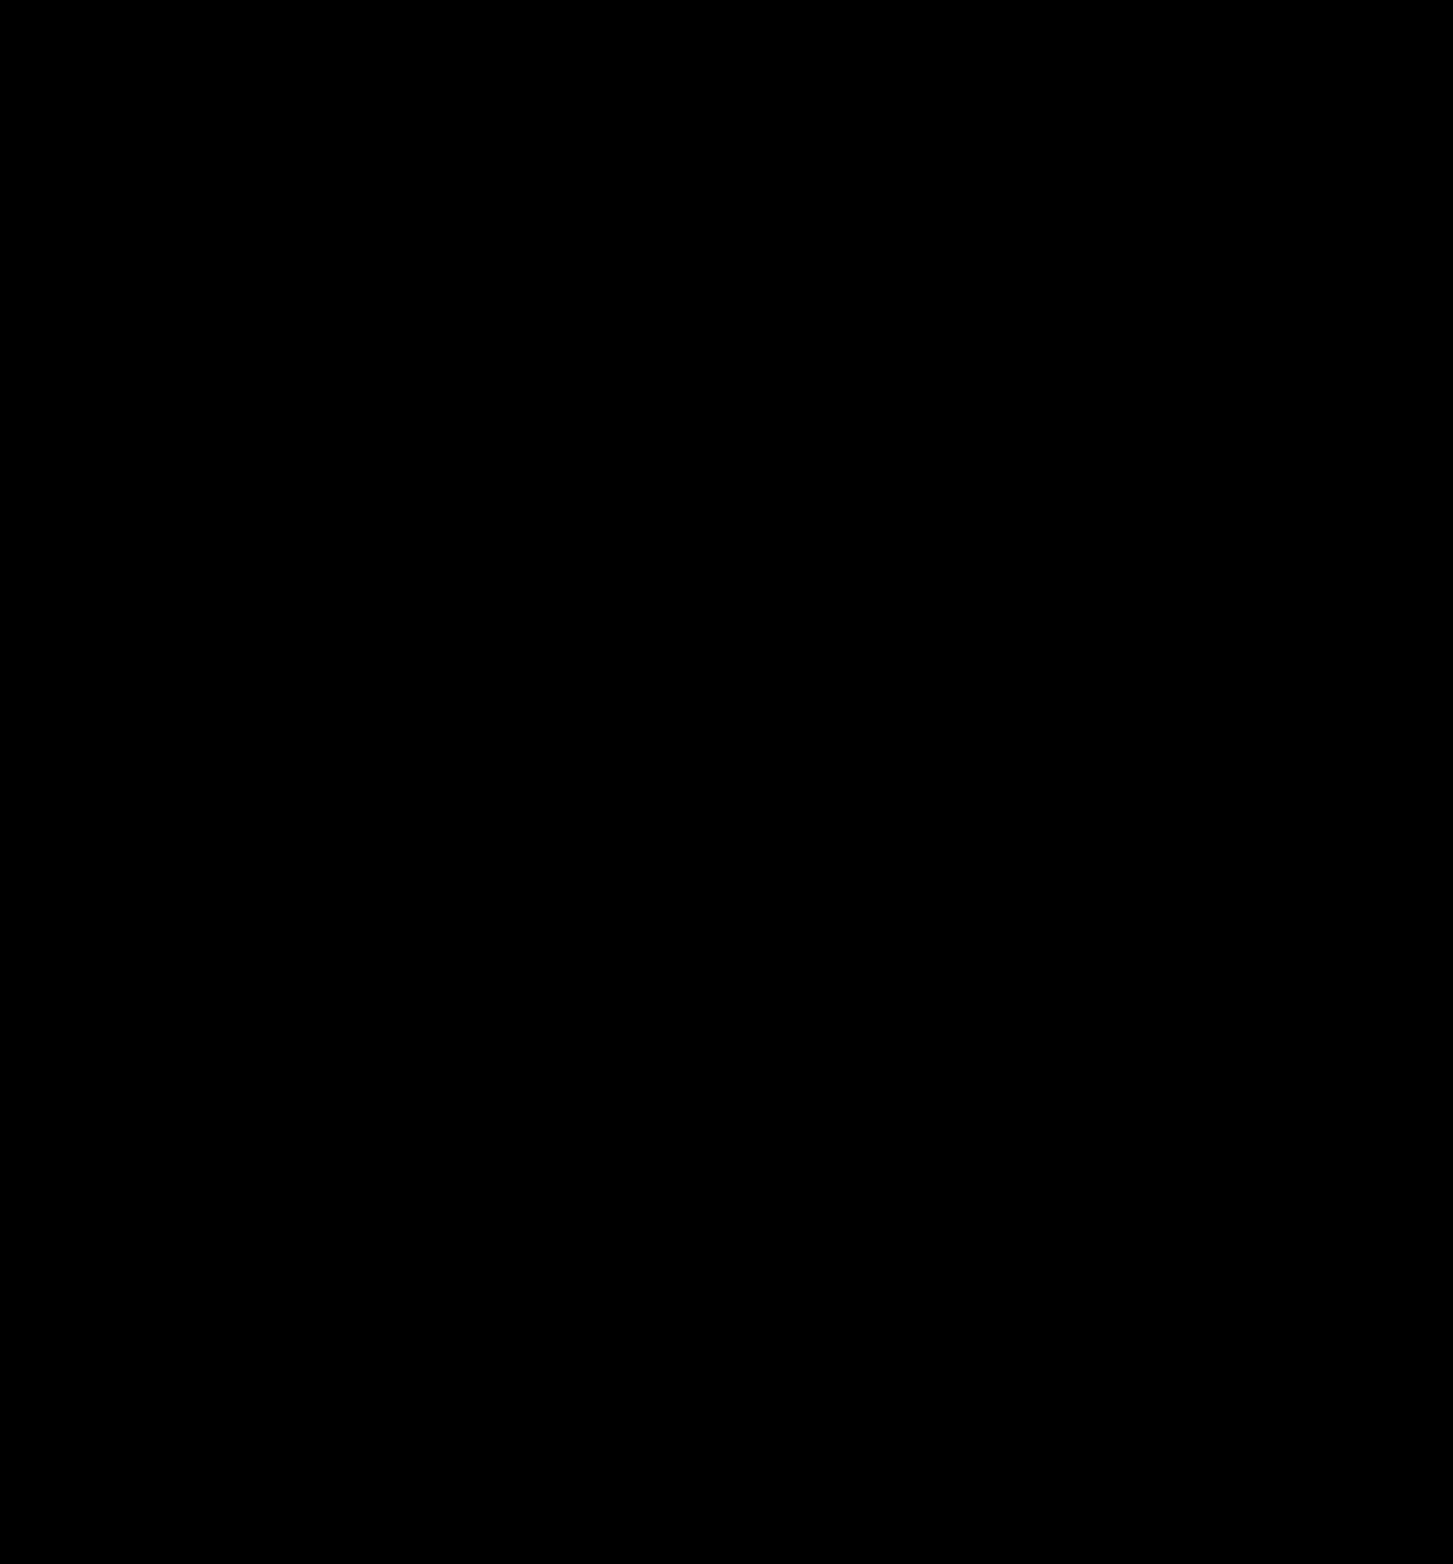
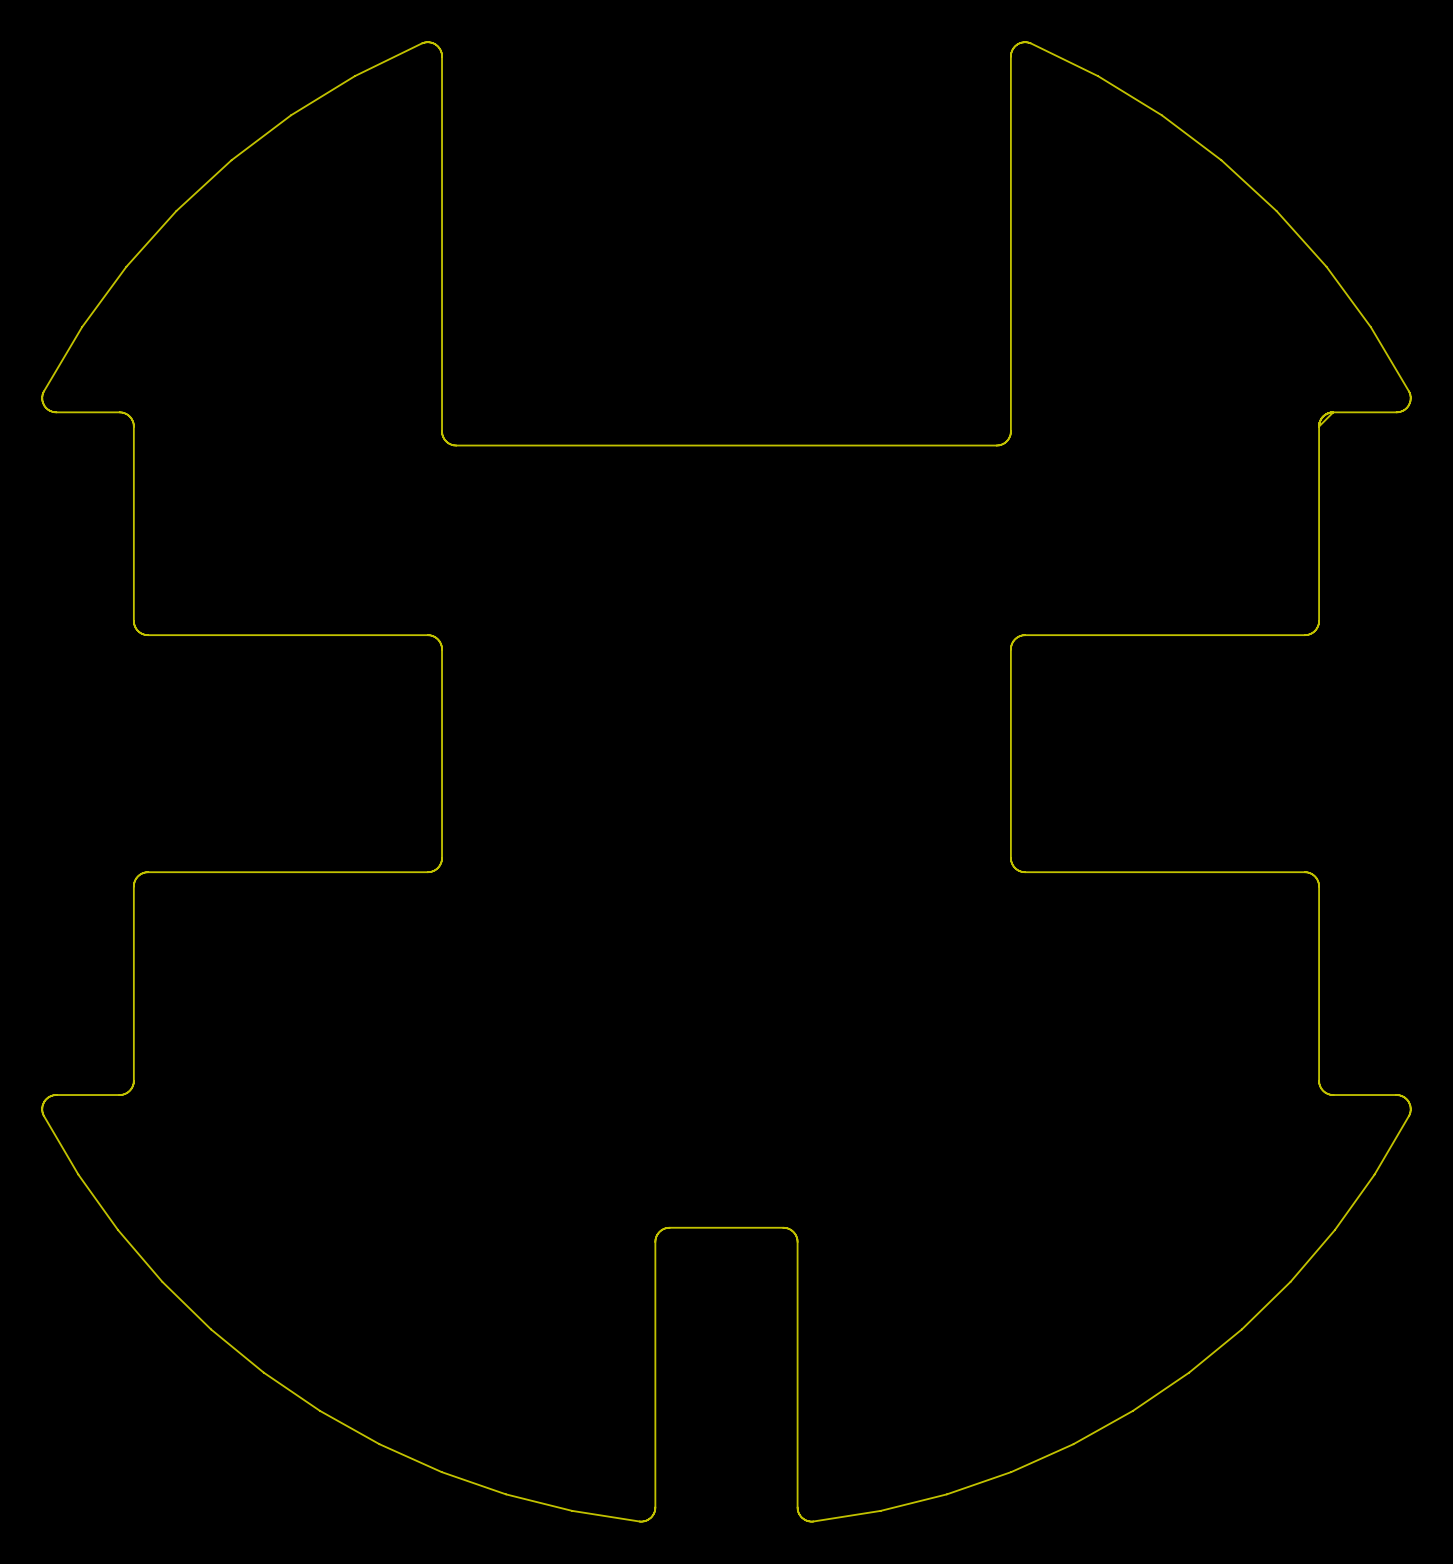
board edge: none -> (1333, 412) (1323, 416) (1319, 426)
board edge: none -> (1333, 412) (1399, 412) (1407, 407) (1410, 397) (1409, 391) (1370, 327) (1326, 266) (1276, 211) (1221, 160) (1161, 115) (1098, 76) (1030, 43) (1024, 42) (1015, 46) (1010, 56) (1010, 431) (1009, 438) (1004, 442) (996, 445) (451, 444) (444, 439) (442, 431) (441, 52) (435, 44) (424, 42) (354, 76) (291, 115) (231, 160) (176, 211) (126, 266) (82, 327) (43, 391) (42, 400) (46, 407) (53, 412) (122, 412) (127, 414) (132, 420) (133, 620) (135, 628) (140, 633) (148, 635) (427, 635) (438, 640) (442, 649) (441, 861) (435, 869) (427, 872) (148, 872) (139, 874) (135, 879) (133, 886) (133, 1085) (128, 1091) (122, 1094) (52, 1095) (43, 1102) (42, 1109) (43, 1115) (78, 1174) (118, 1230) (162, 1281) (211, 1329) (263, 1372) (320, 1410) (379, 1444) (441, 1472) (506, 1494) (572, 1510) (639, 1521) (648, 1519) (654, 1513) (655, 1241) (658, 1232) (667, 1227) (783, 1227) (791, 1230) (796, 1236) (797, 1507) (798, 1513) (804, 1519) (813, 1521) (880, 1510) (946, 1494) (1011, 1472) (1073, 1444) (1132, 1410) (1189, 1372) (1241, 1329) (1290, 1281) (1334, 1230) (1374, 1174) (1410, 1113) (1409, 1102) (1400, 1095) (1330, 1094) (1324, 1091) (1319, 1085) (1319, 886) (1317, 879) (1311, 874) (1304, 872) (1025, 872) (1016, 868) (1011, 860) (1010, 649) (1013, 641) (1018, 637) (1025, 635) (1304, 635) (1313, 632) (1317, 628) (1319, 620) (1319, 426)
board edge: none -> (1333, 412) (1319, 426)

